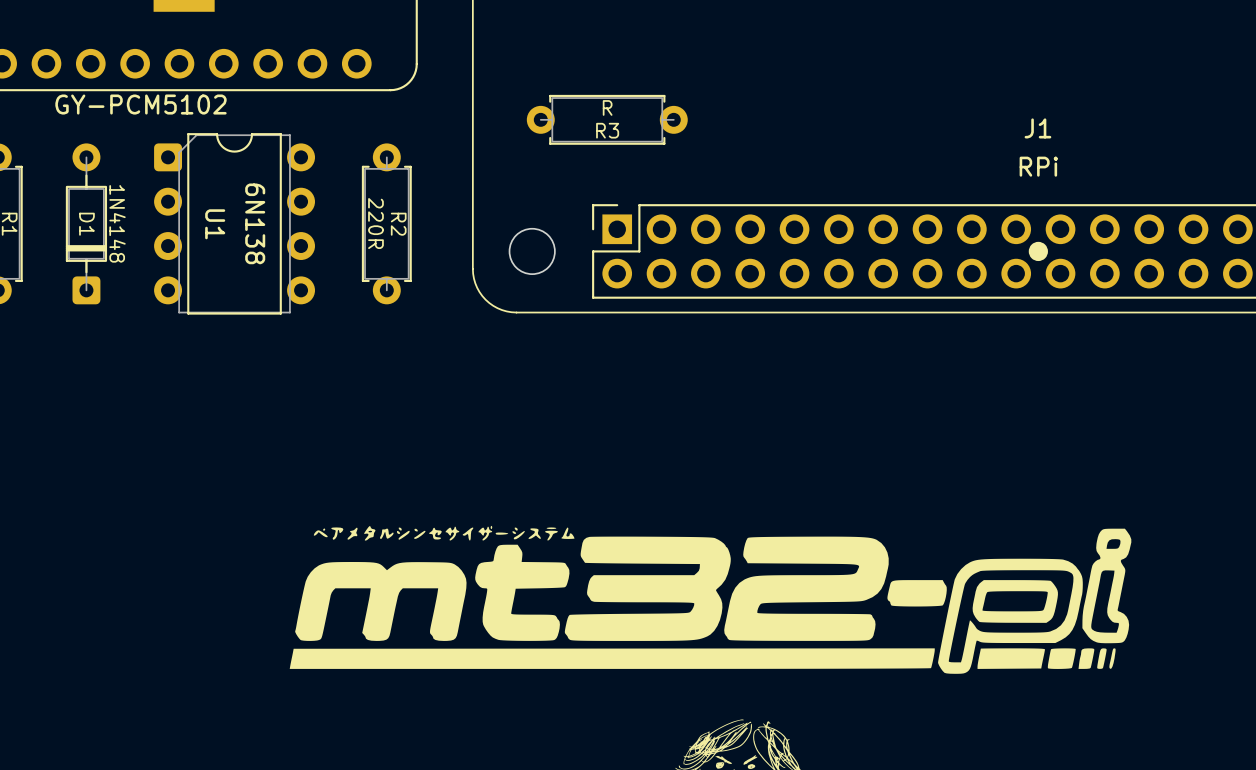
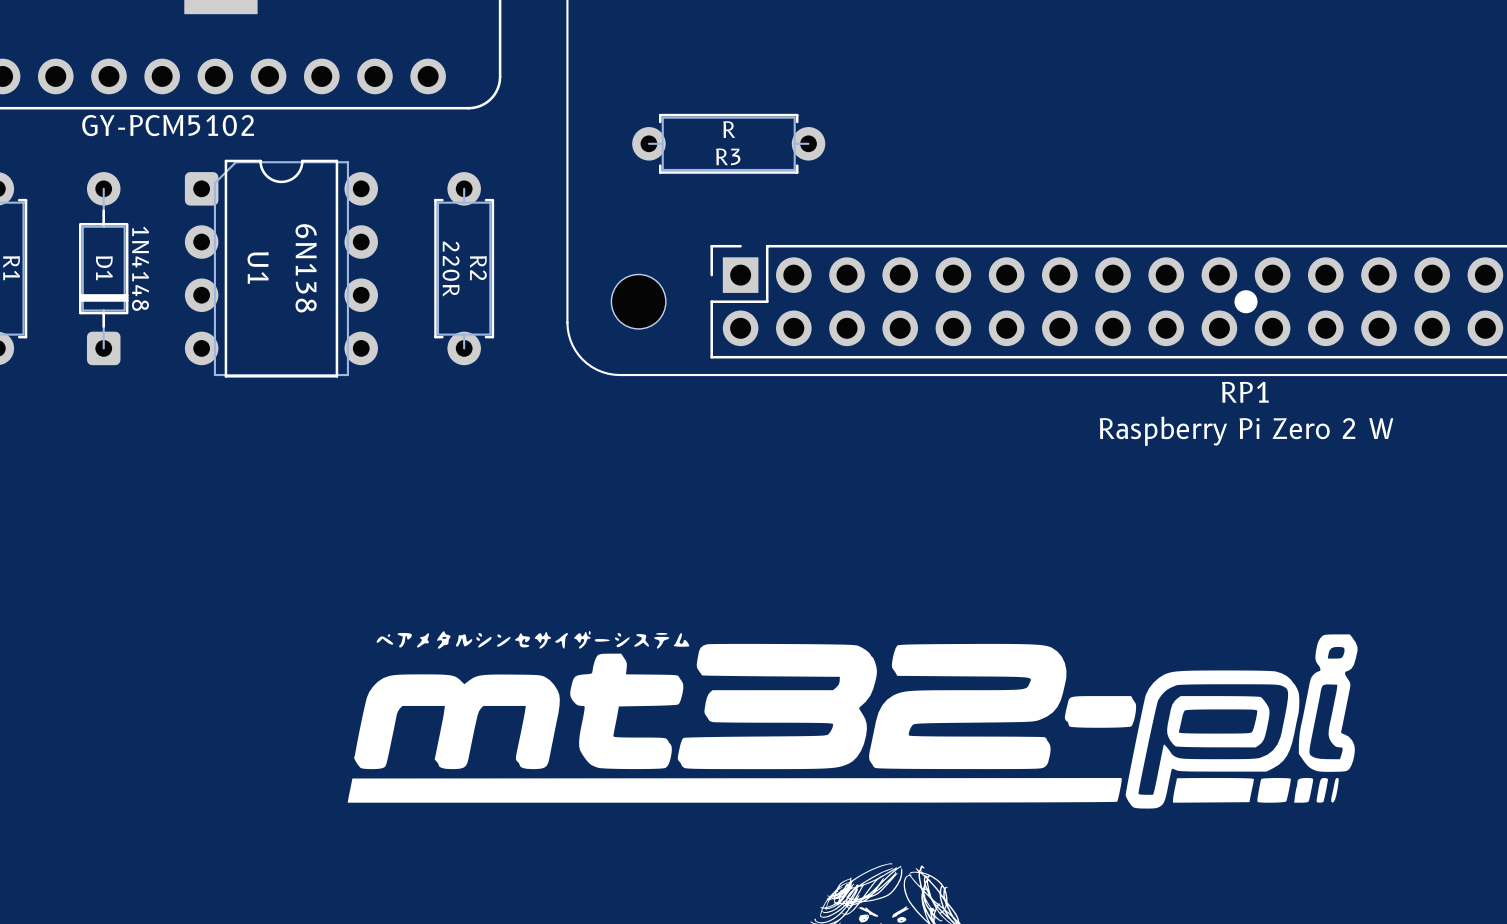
J1 name: J1 (1037, 128) -> RP1 (1245, 392)
J1 value: RPi (1038, 166) -> Raspberry Pi Zero 2 W (1246, 431)

